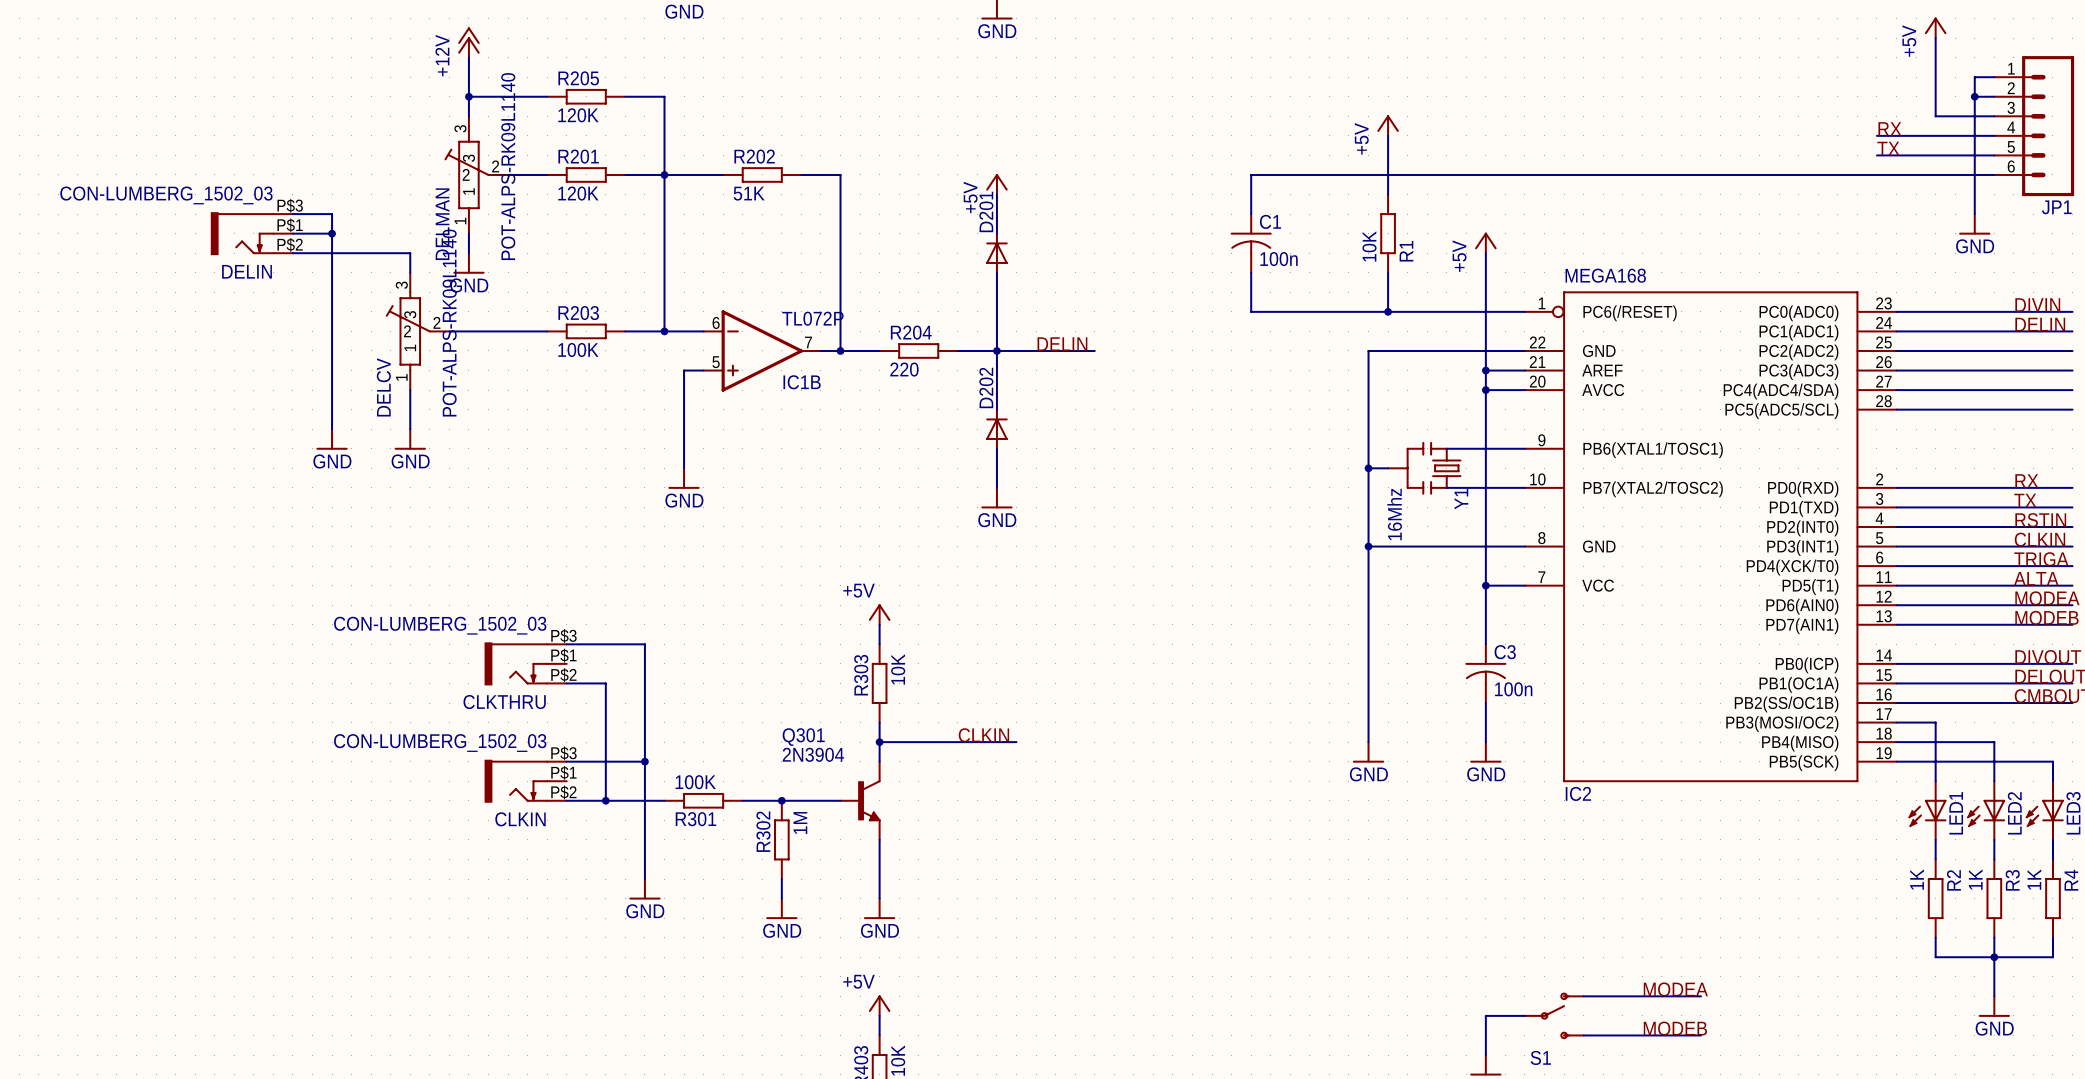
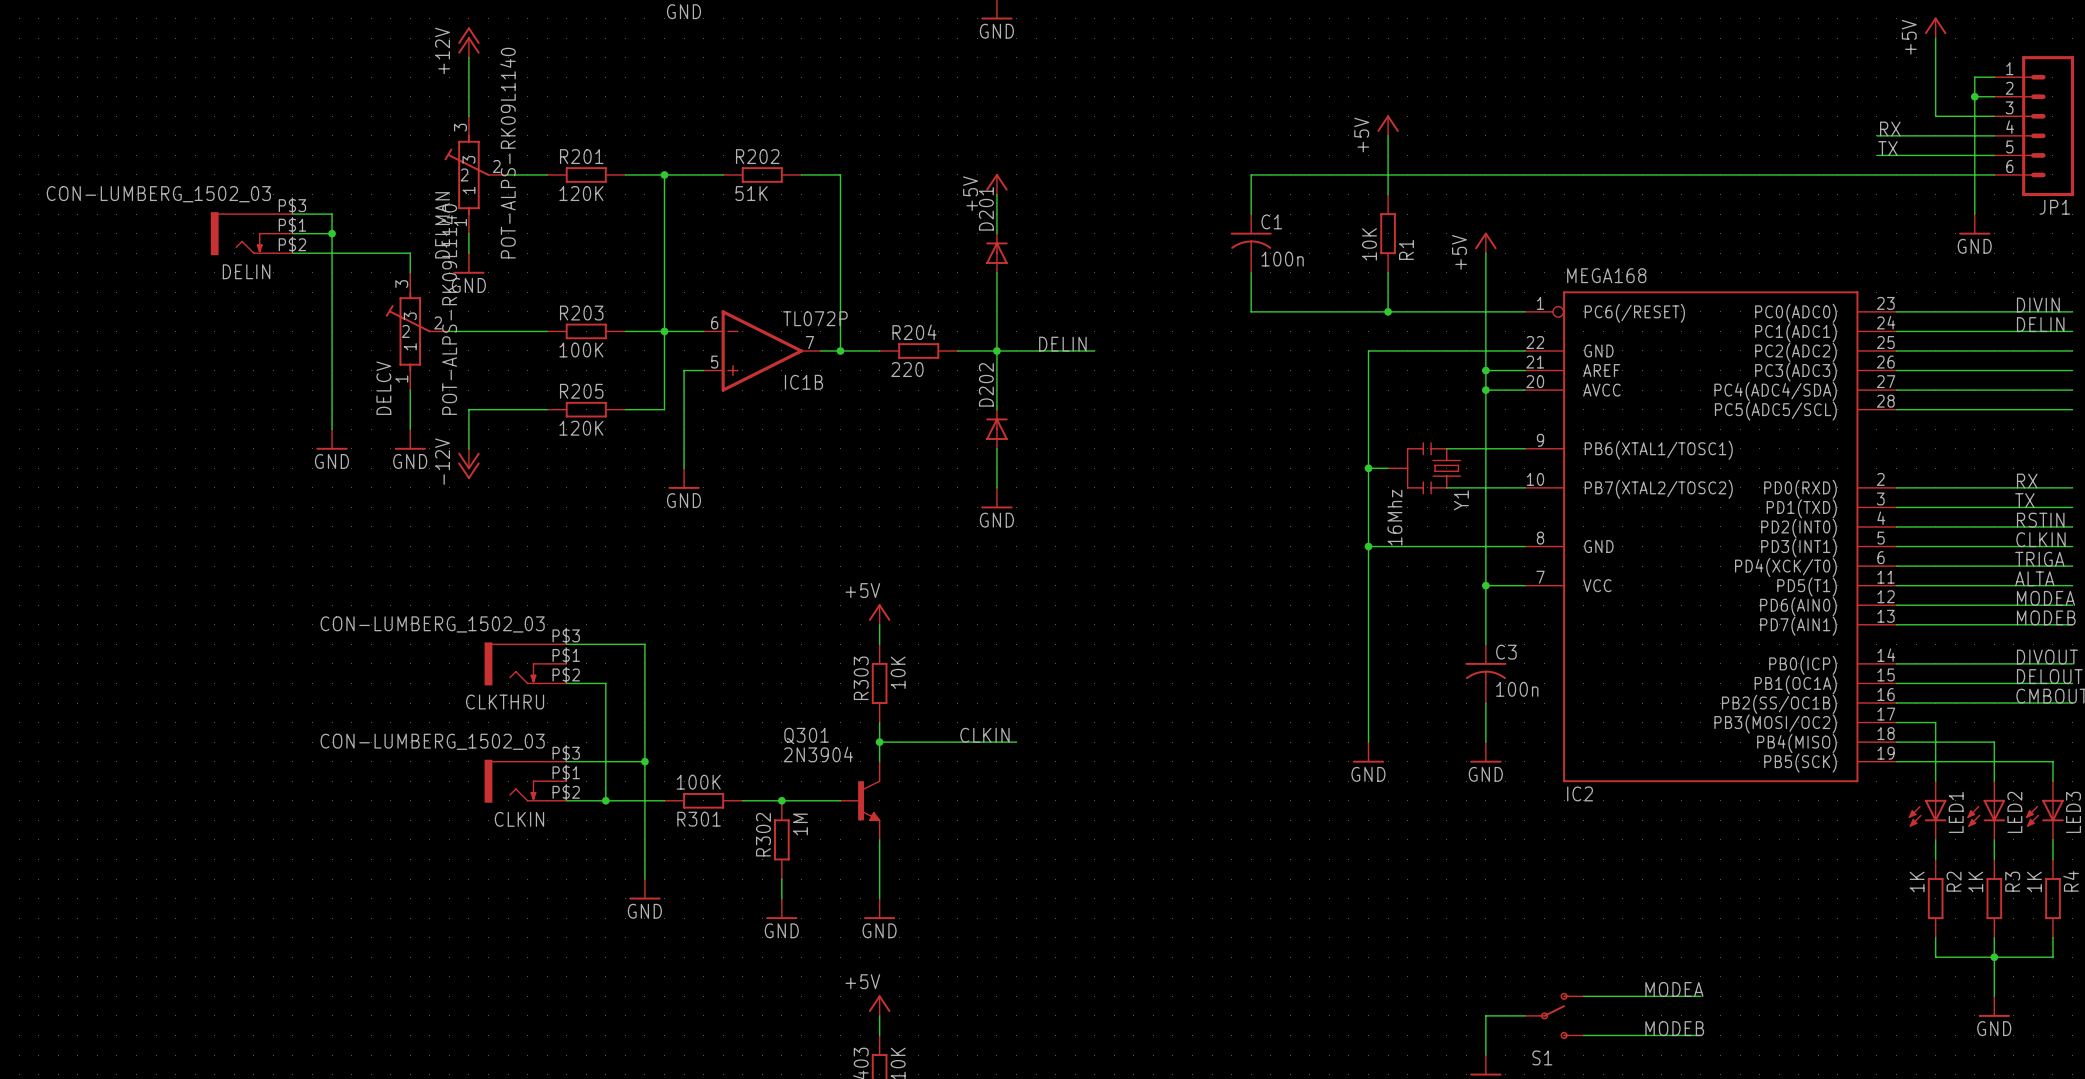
wire: (468, 96) (547, 96) -> none
junction: (468, 96) -> none
R205 position: (586, 96) -> (586, 409)
wire: (625, 96) (664, 96) (664, 174) -> none
wire: none -> (664, 331) (664, 409) (625, 409)
wire: none -> (547, 409) (468, 409) (468, 448)
power symbol: none -> -12V (468, 463)

